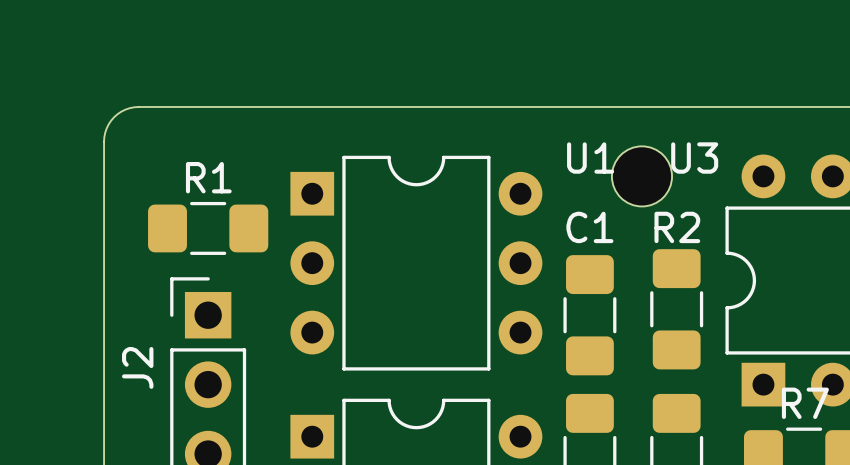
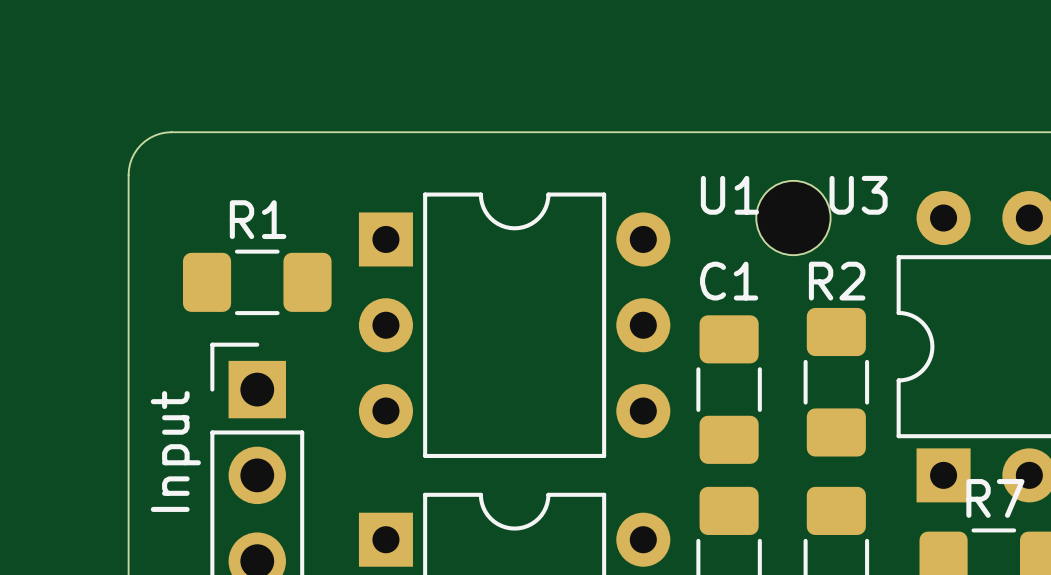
J2 name: J2 (137, 367) -> Input (175, 451)

